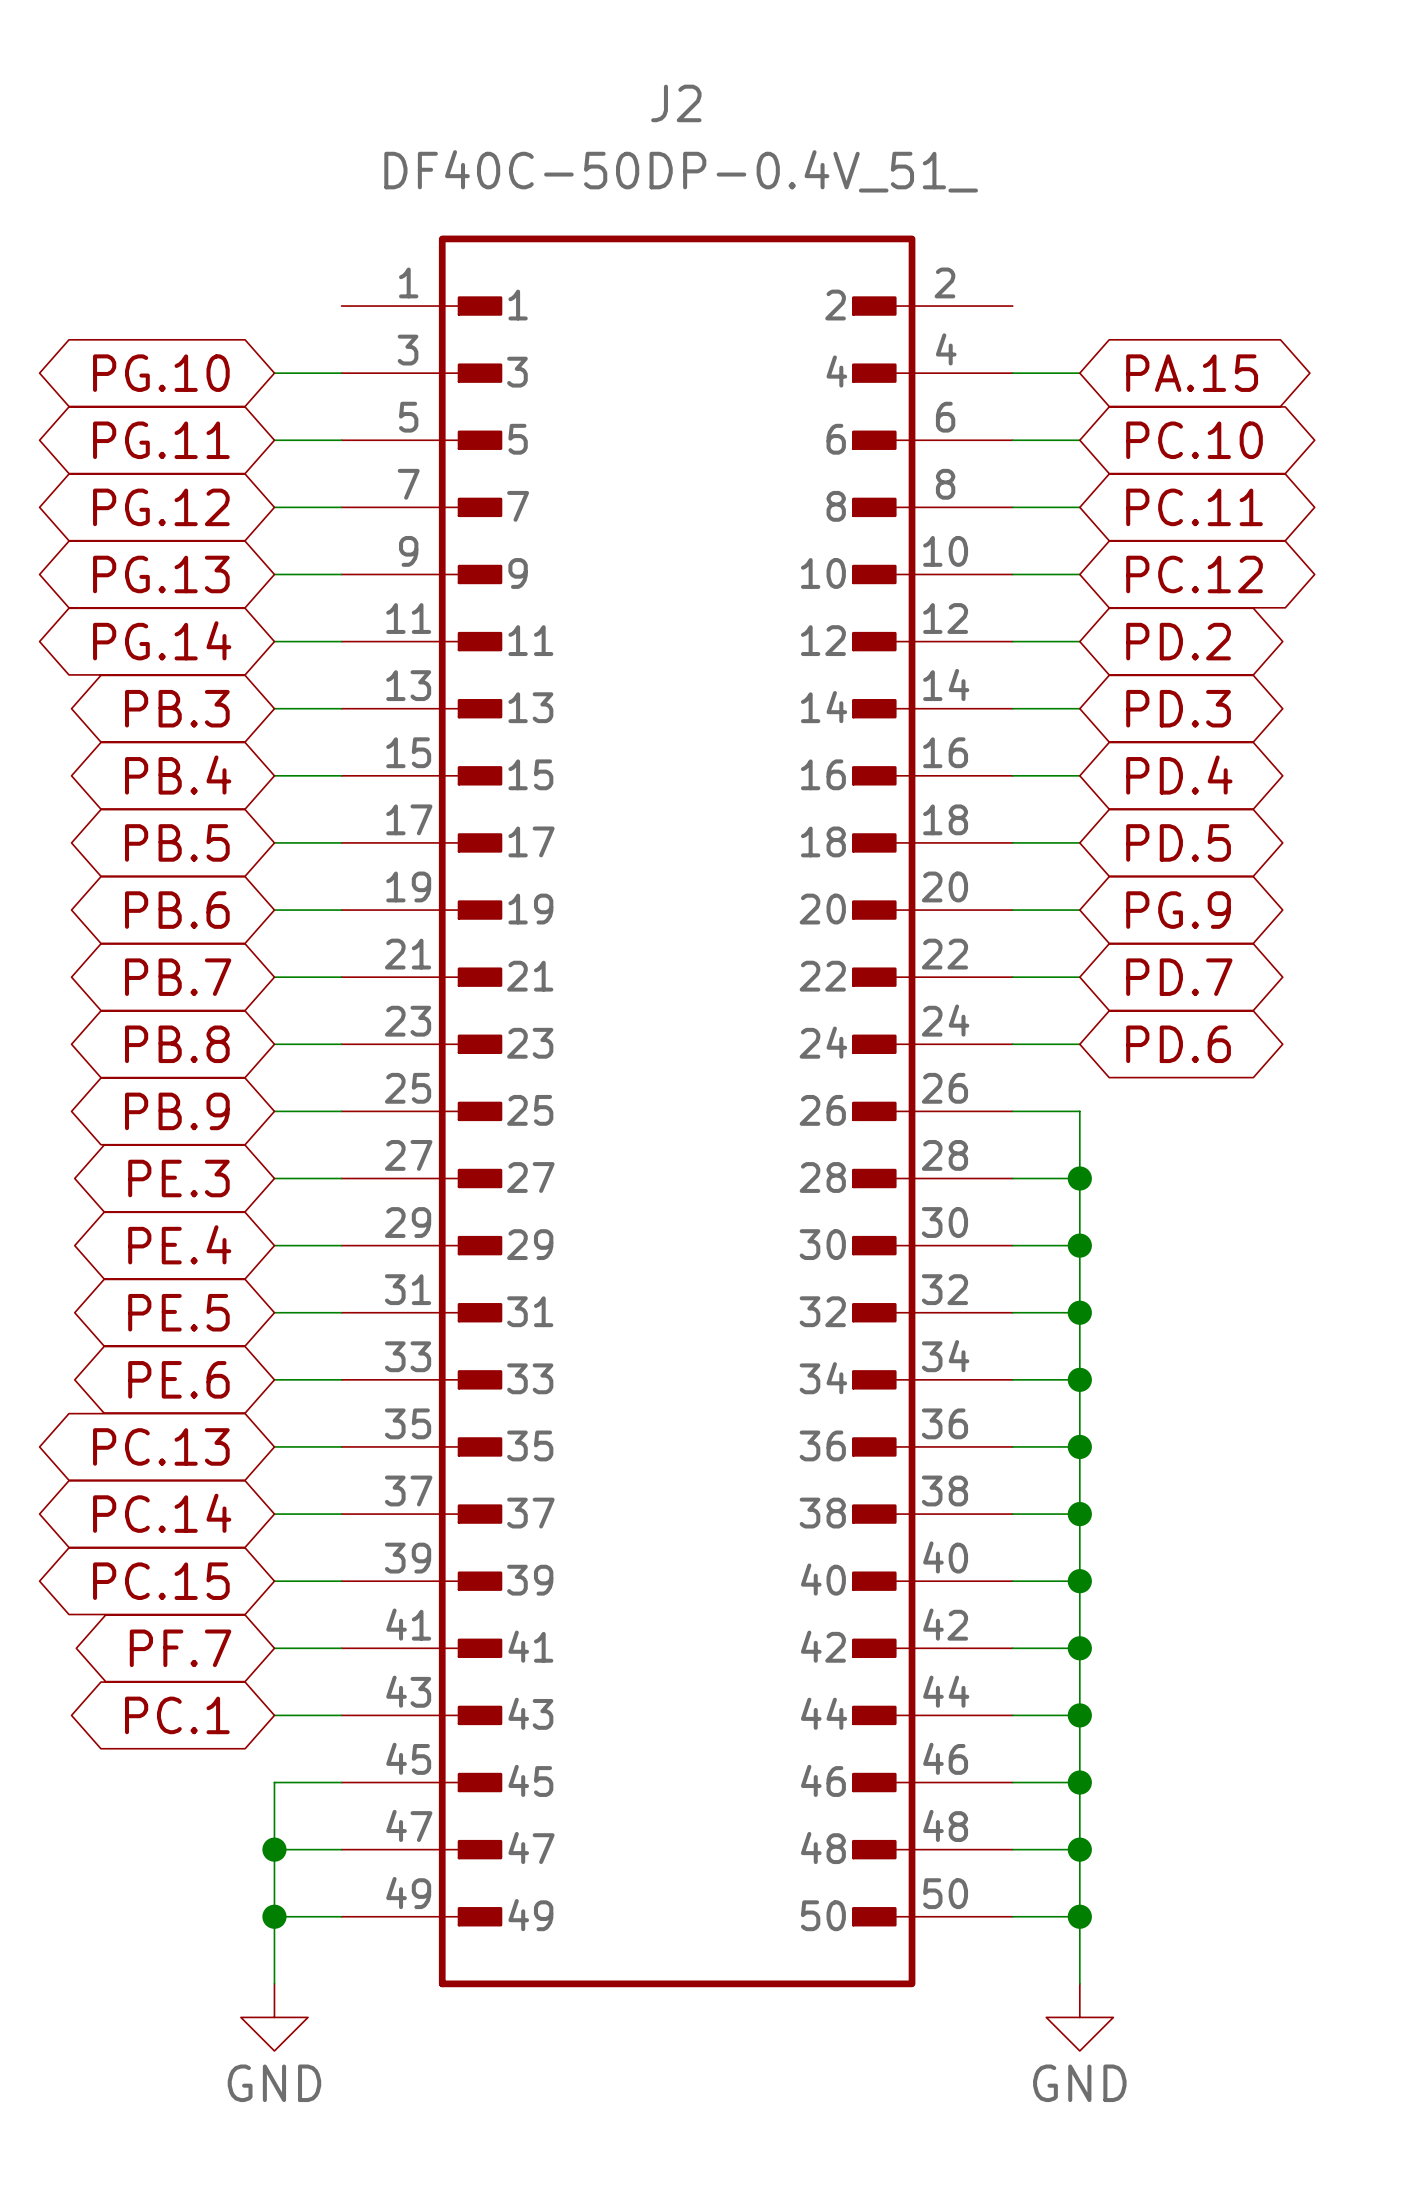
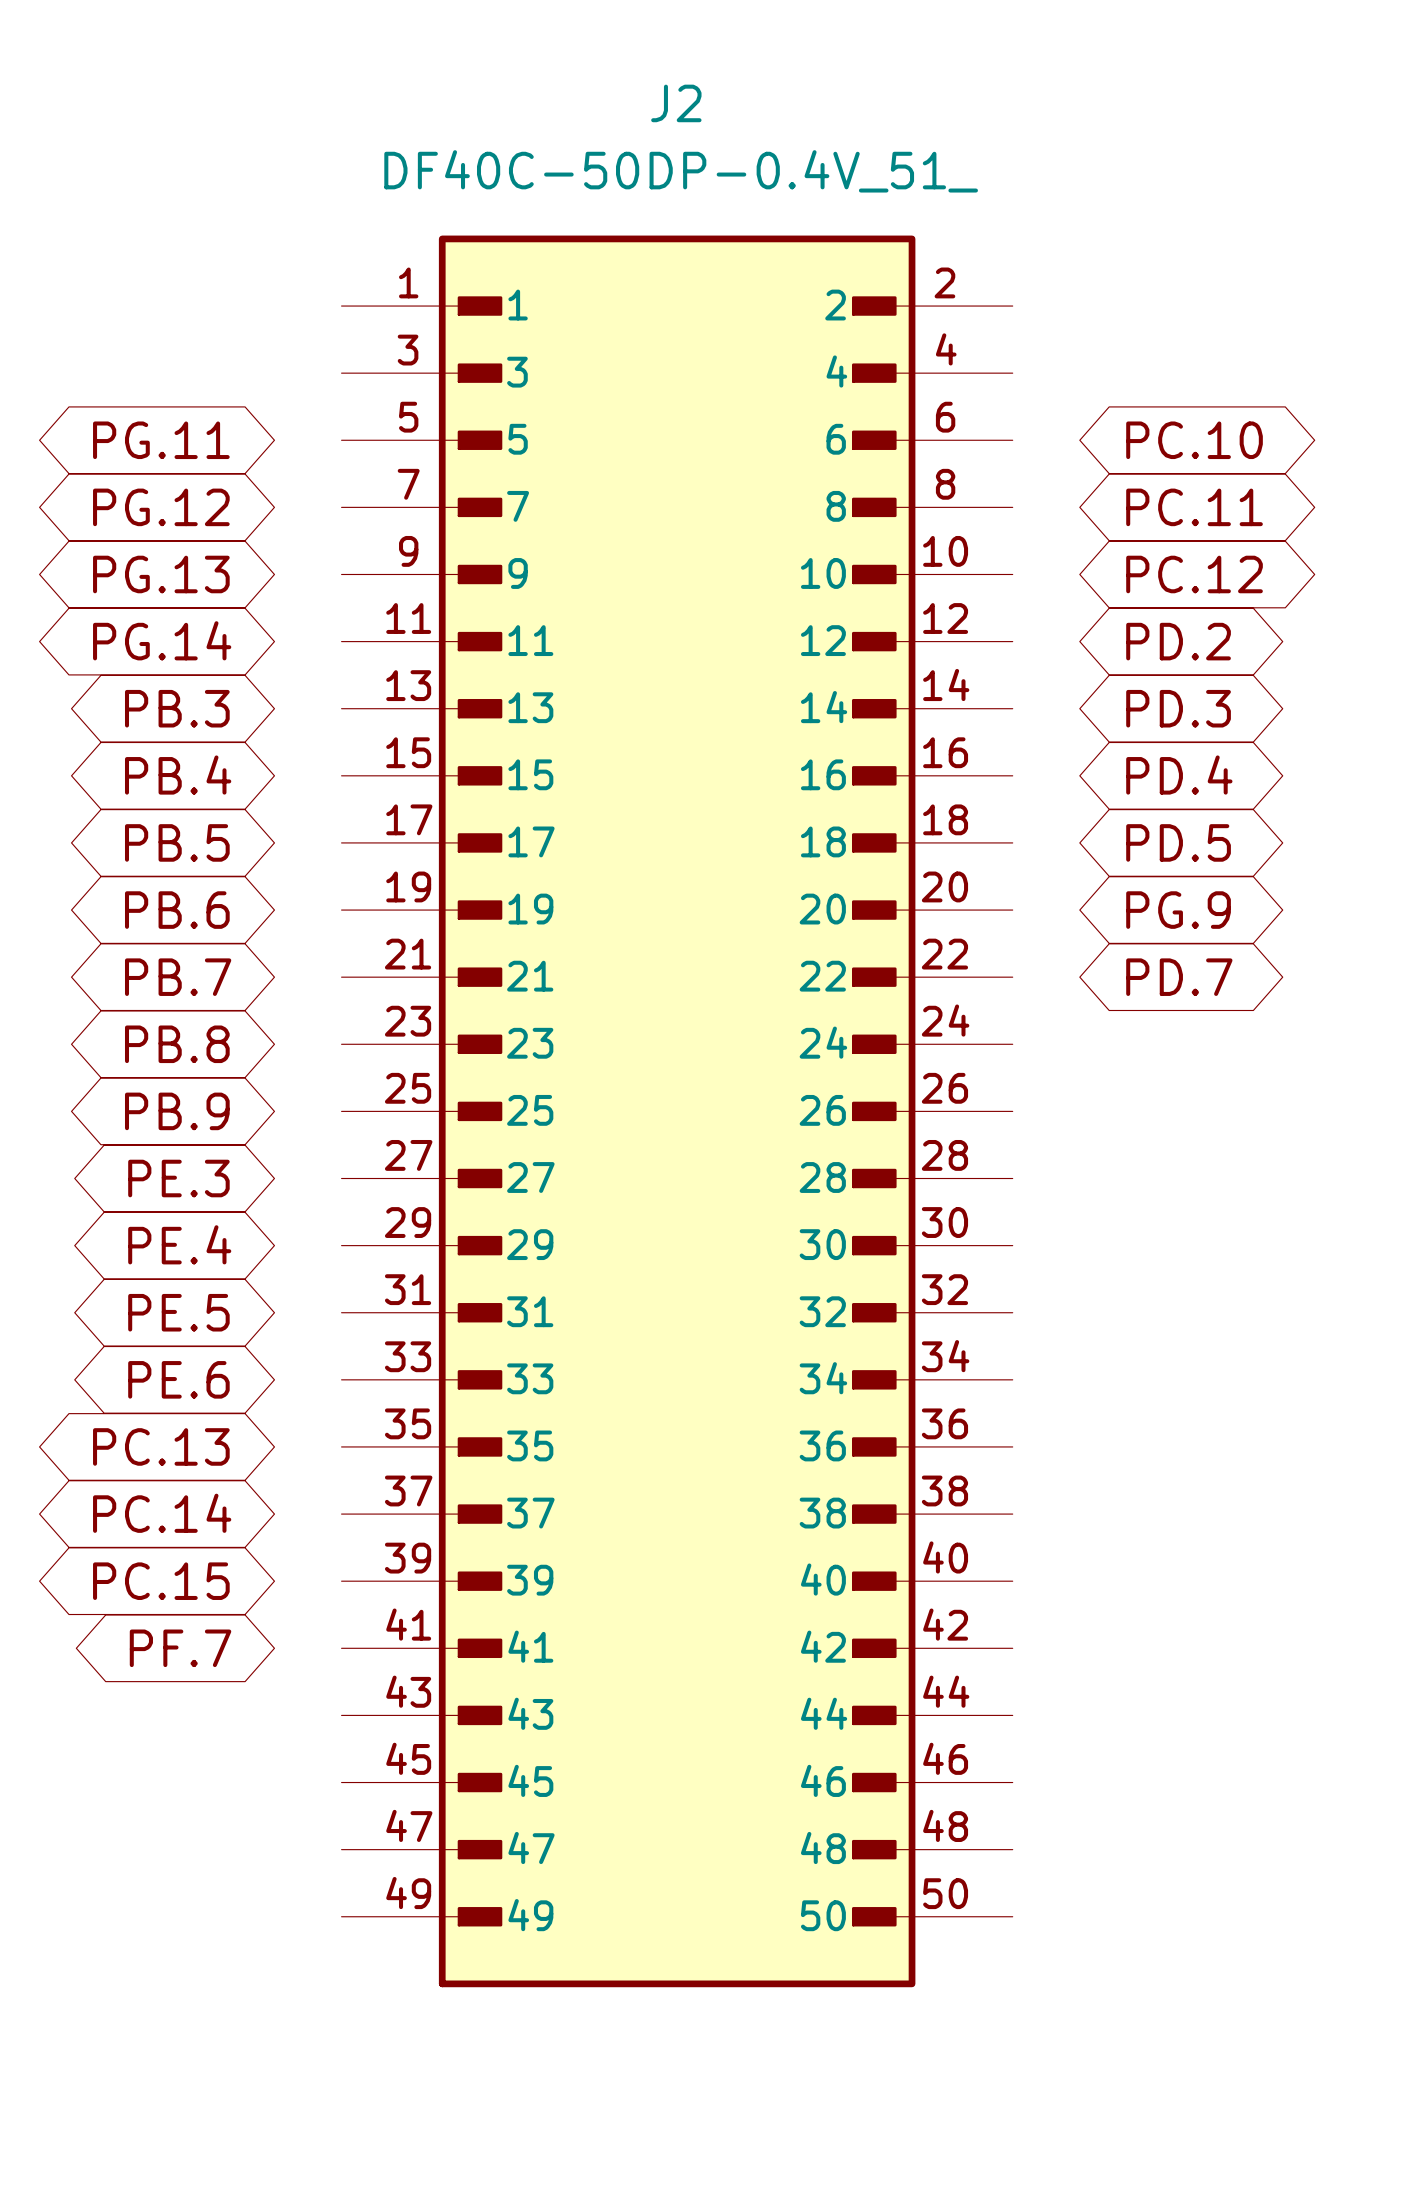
global label: PG.10 (161, 373) -> none
wire: (274, 373) (341, 373) -> none
wire: (1012, 373) (1079, 373) -> none
global label: PA.15 (1192, 373) -> none
wire: (274, 440) (341, 440) -> none
wire: (1012, 440) (1079, 440) -> none
wire: (274, 507) (341, 507) -> none
wire: (1012, 507) (1079, 507) -> none
wire: (274, 574) (341, 574) -> none
wire: (1012, 574) (1079, 574) -> none
wire: (274, 641) (341, 641) -> none
wire: (1012, 641) (1079, 641) -> none
wire: (274, 708) (341, 708) -> none
wire: (1012, 708) (1079, 708) -> none
wire: (274, 775) (341, 775) -> none
wire: (1012, 775) (1079, 775) -> none
wire: (274, 842) (341, 842) -> none
wire: (1012, 842) (1079, 842) -> none
wire: (274, 910) (341, 910) -> none
wire: (1012, 910) (1079, 910) -> none
wire: (274, 977) (341, 977) -> none
wire: (1012, 977) (1079, 977) -> none
wire: (274, 1044) (341, 1044) -> none
wire: (1012, 1044) (1079, 1044) -> none
global label: PD.6 (1178, 1044) -> none
wire: (274, 1111) (341, 1111) -> none
wire: (1012, 1111) (1079, 1111) (1079, 1983) -> none
wire: (274, 1178) (341, 1178) -> none
wire: (1012, 1178) (1079, 1178) -> none
junction: (1079, 1178) -> none
wire: (274, 1245) (341, 1245) -> none
wire: (1012, 1245) (1079, 1245) -> none
junction: (1079, 1245) -> none
wire: (274, 1312) (341, 1312) -> none
wire: (1012, 1312) (1079, 1312) -> none
junction: (1079, 1312) -> none
wire: (274, 1379) (341, 1379) -> none
wire: (1012, 1379) (1079, 1379) -> none
junction: (1079, 1379) -> none
wire: (274, 1446) (341, 1446) -> none
wire: (1012, 1446) (1079, 1446) -> none
junction: (1079, 1446) -> none
wire: (274, 1514) (341, 1514) -> none
wire: (1012, 1514) (1079, 1514) -> none
junction: (1079, 1514) -> none
wire: (274, 1581) (341, 1581) -> none
wire: (1012, 1581) (1079, 1581) -> none
junction: (1079, 1581) -> none
wire: (274, 1648) (341, 1648) -> none
wire: (1012, 1648) (1079, 1648) -> none
junction: (1079, 1648) -> none
global label: PC.1 (177, 1715) -> none
wire: (274, 1715) (341, 1715) -> none
wire: (1012, 1715) (1079, 1715) -> none
junction: (1079, 1715) -> none
wire: (341, 1782) (274, 1782) (274, 1983) -> none
wire: (1012, 1782) (1079, 1782) -> none
junction: (1079, 1782) -> none
wire: (274, 1849) (341, 1849) -> none
junction: (274, 1849) -> none
wire: (1012, 1849) (1079, 1849) -> none
junction: (1079, 1849) -> none
wire: (274, 1916) (341, 1916) -> none
junction: (274, 1916) -> none
wire: (1012, 1916) (1079, 1916) -> none
junction: (1079, 1916) -> none
power symbol: GND (274, 2017) -> none
power symbol: GND (1079, 2017) -> none

